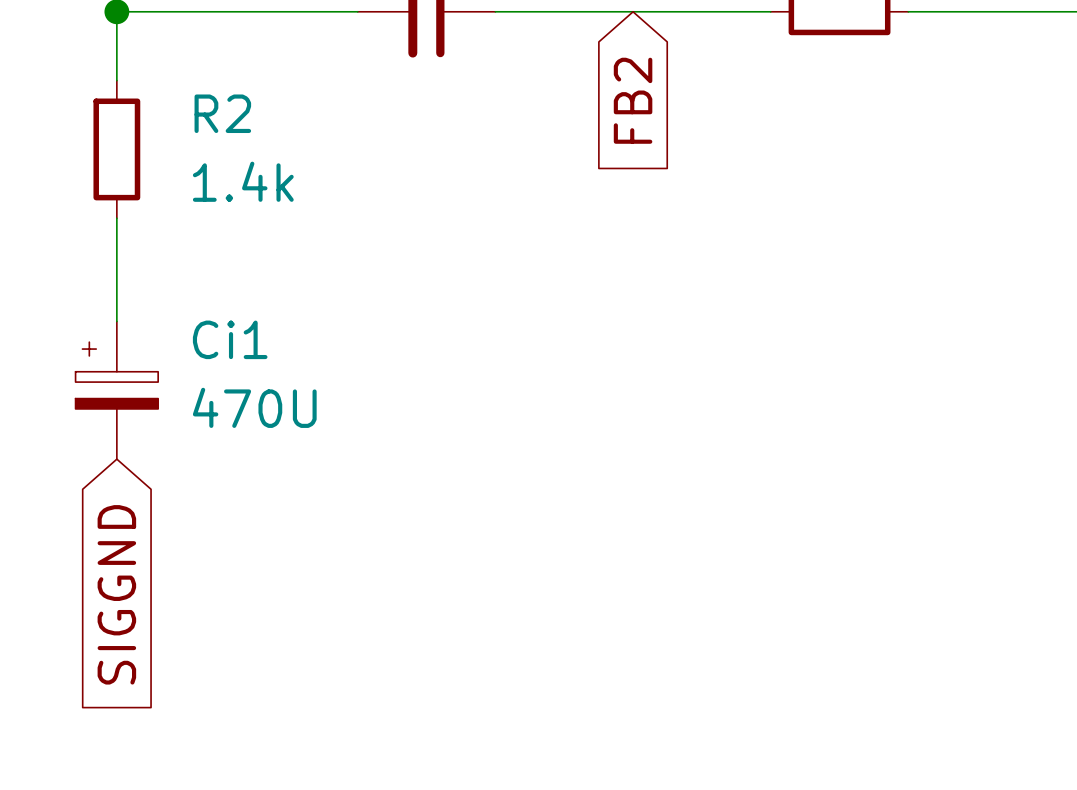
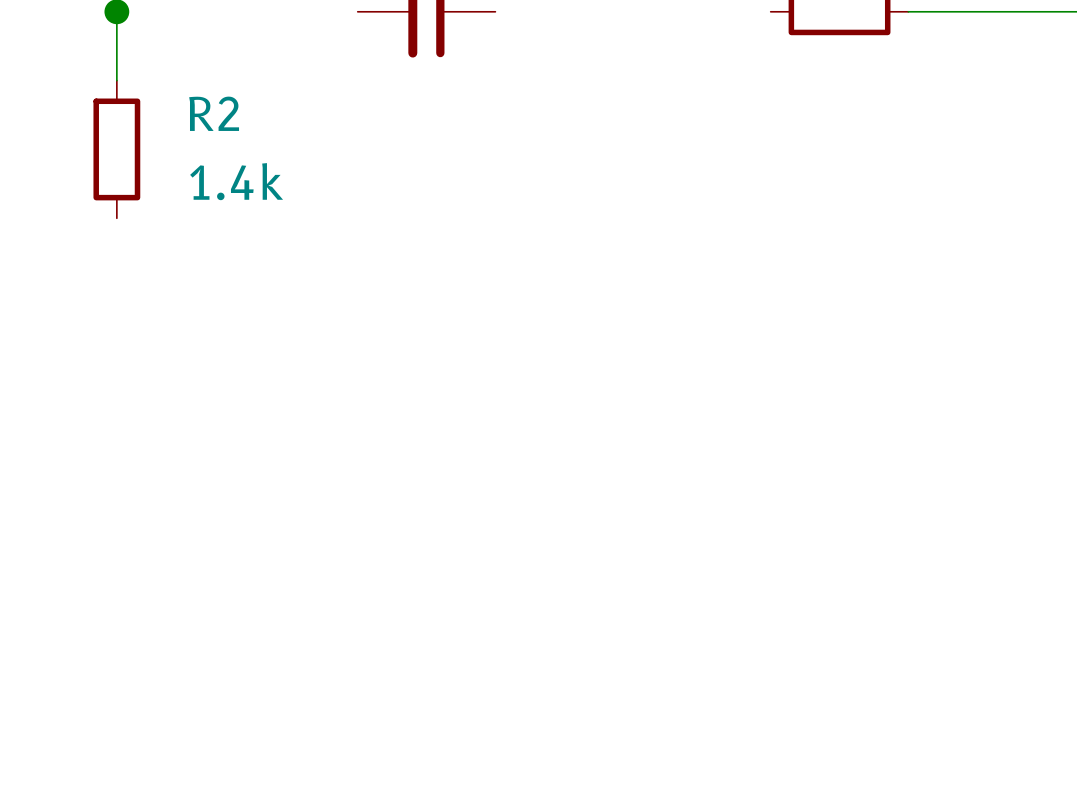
wire: (116, 11) (357, 11) -> none
wire: (495, 11) (770, 11) -> none
global label: FB2 (633, 100) -> none
wire: (116, 218) (116, 321) -> none
Ci1: 470U (116, 390) -> none
global label: SIGGND (116, 594) -> none

